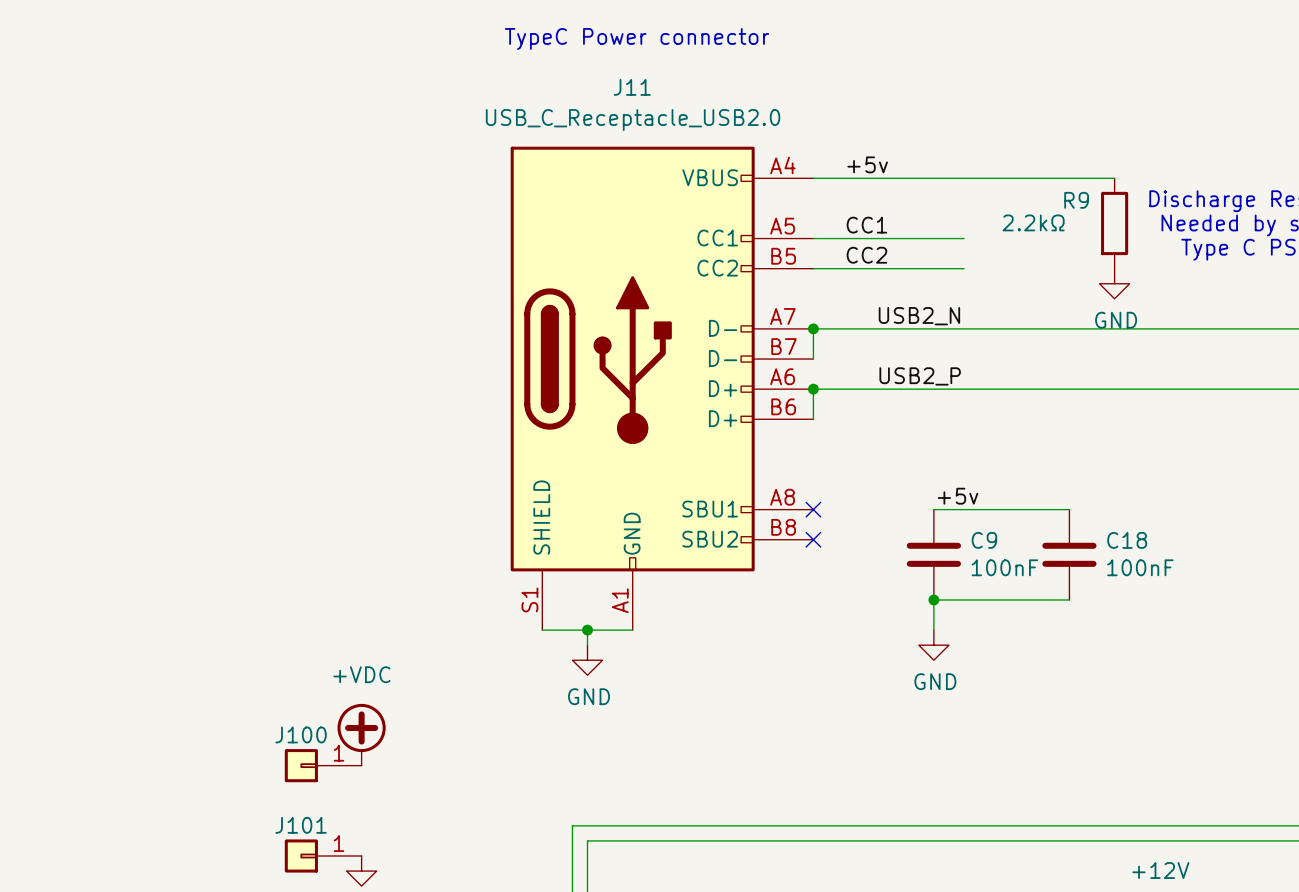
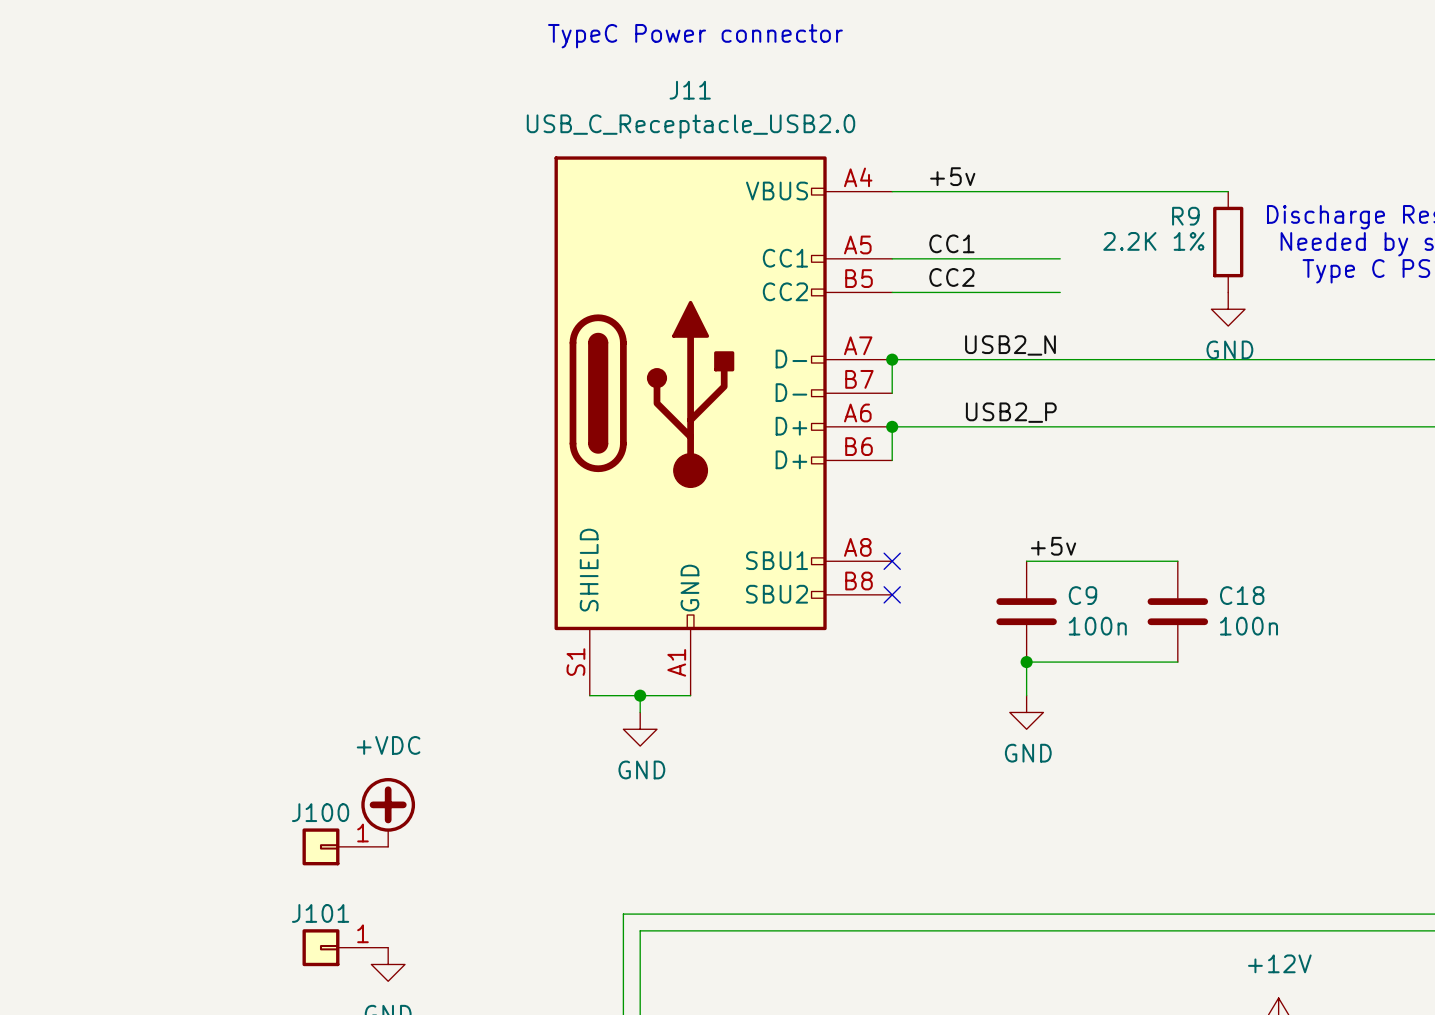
R9 value: 2.2kΩ (1033, 222) -> 2.2K 1% (1153, 241)
C9 value: 100nF (1004, 567) -> 100n (1097, 626)
C18 value: 100nF (1140, 567) -> 100n (1248, 626)

